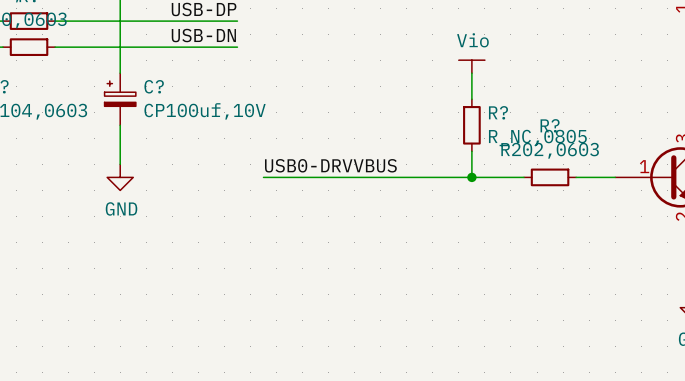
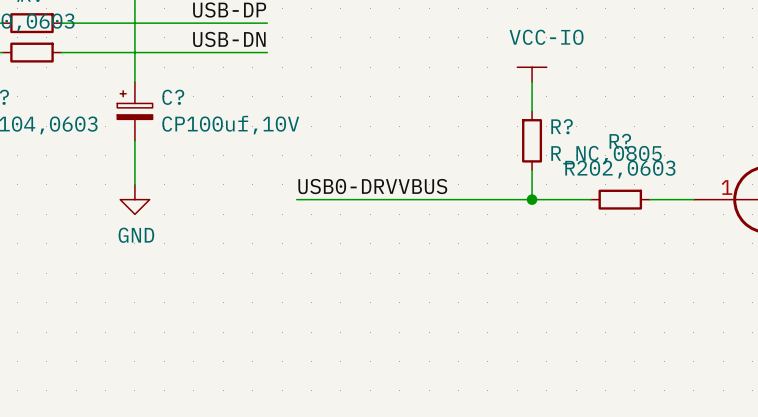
power symbol: Vio (471, 66) -> VCC-IO (532, 74)

